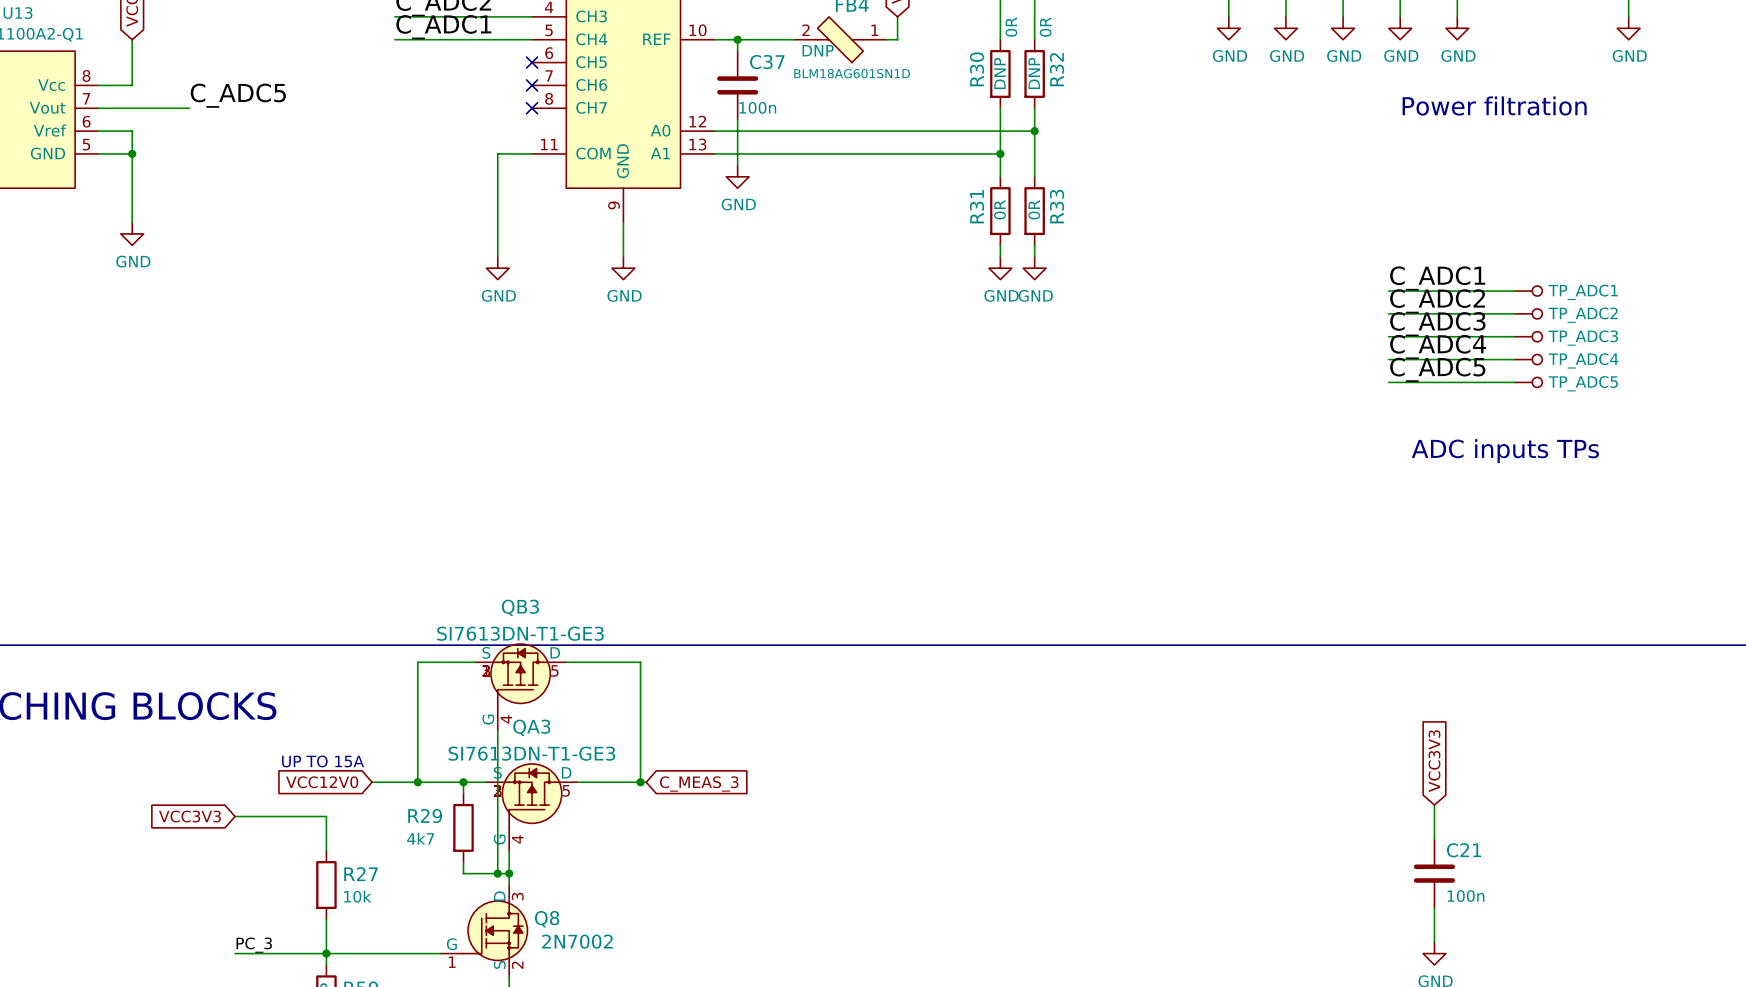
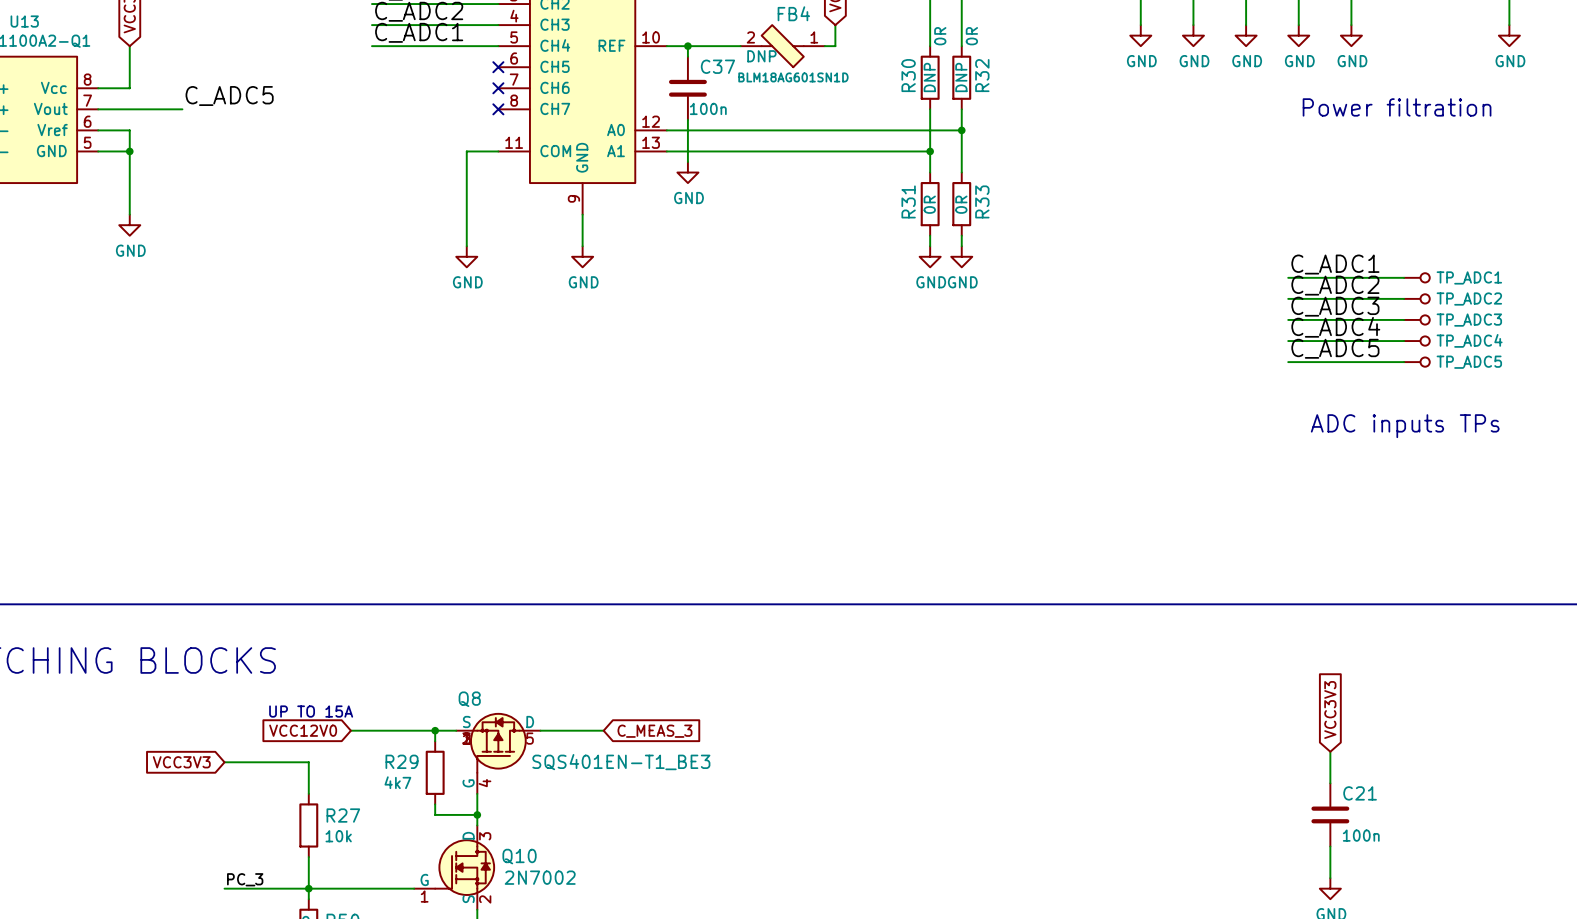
wire: (474, 662) (417, 662) (417, 782) -> none
wire: (566, 662) (640, 662) (640, 782) -> none
QB3: SI7613DN-T1-GE3 (520, 687) -> none
QA3 name: QA3 (531, 727) -> Q8 (469, 699)
wire: (497, 730) (497, 873) -> none
QA3 value: SI7613DN-T1-GE3 (531, 753) -> SQS401EN-T1_BE3 (621, 762)
junction: (417, 782) -> none
junction: (640, 782) -> none
junction: (497, 873) -> none
Q8 name: Q8 (547, 919) -> Q10 (519, 856)

